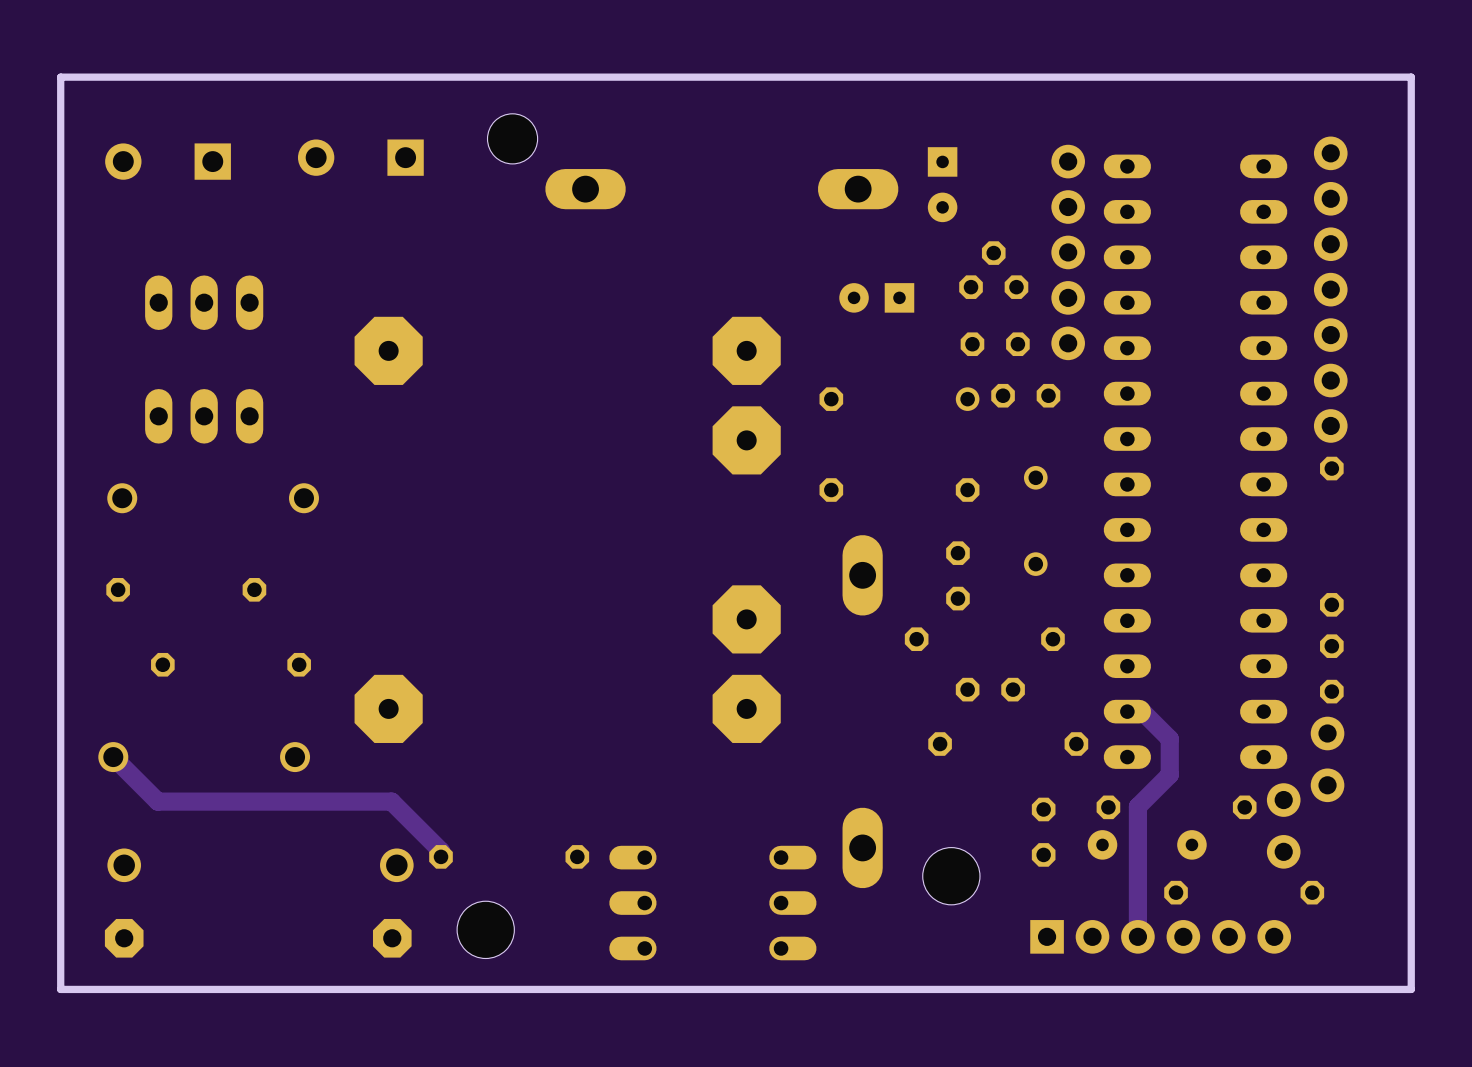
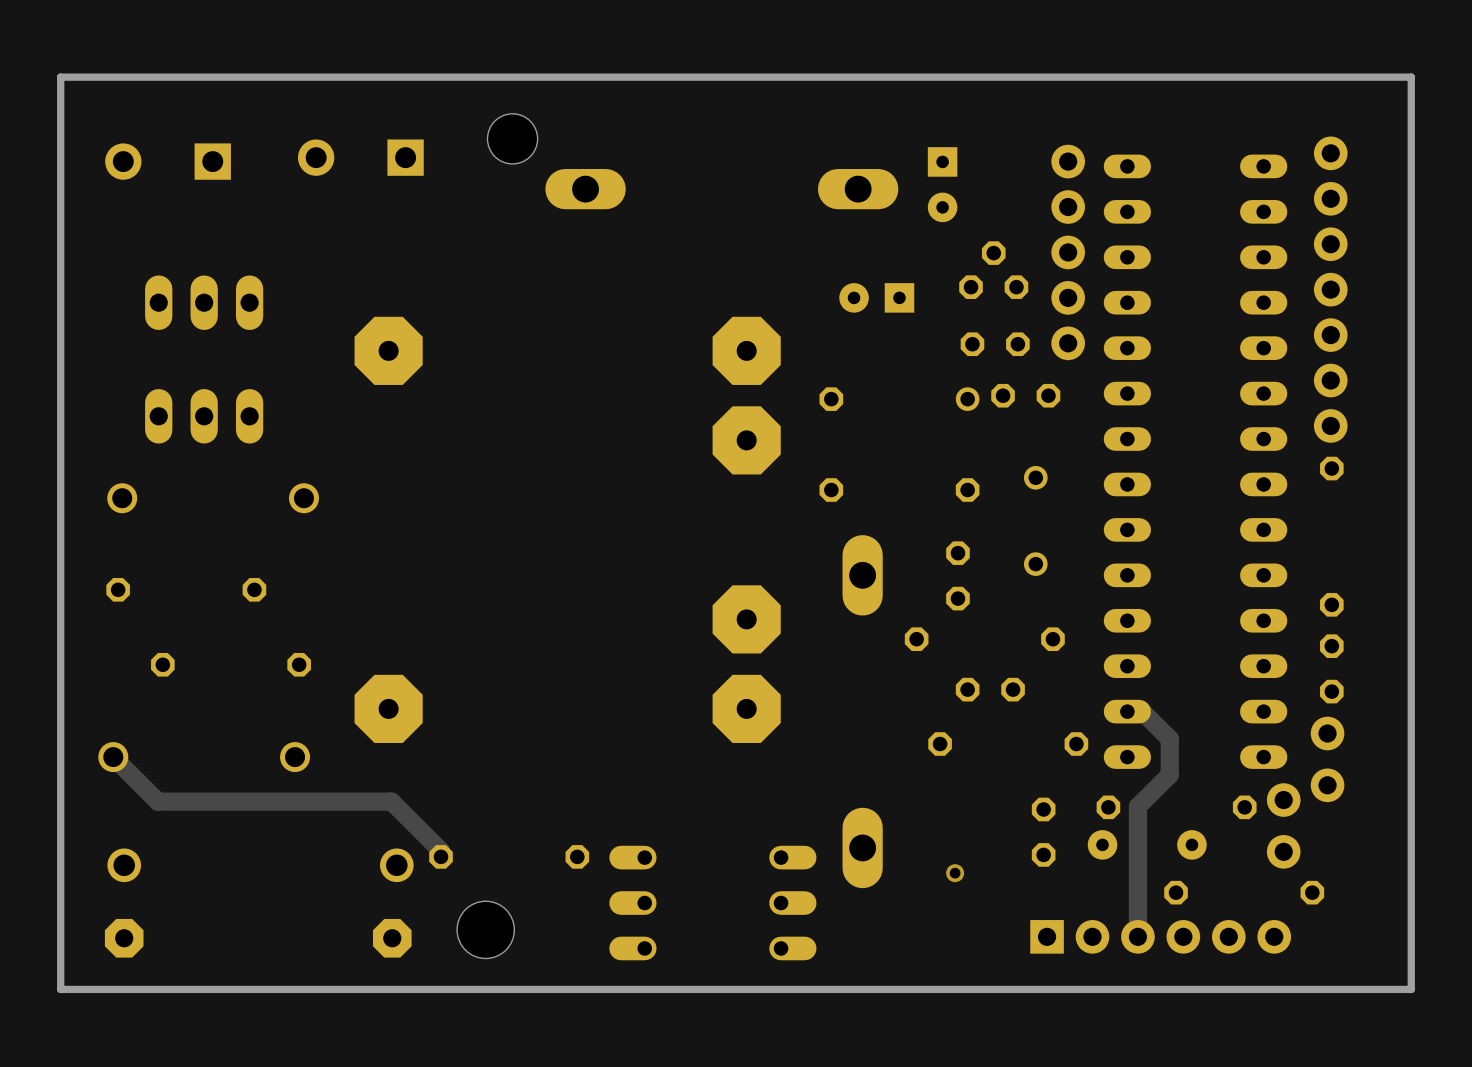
via: none -> (955, 873)
hole: (951, 876) -> none

